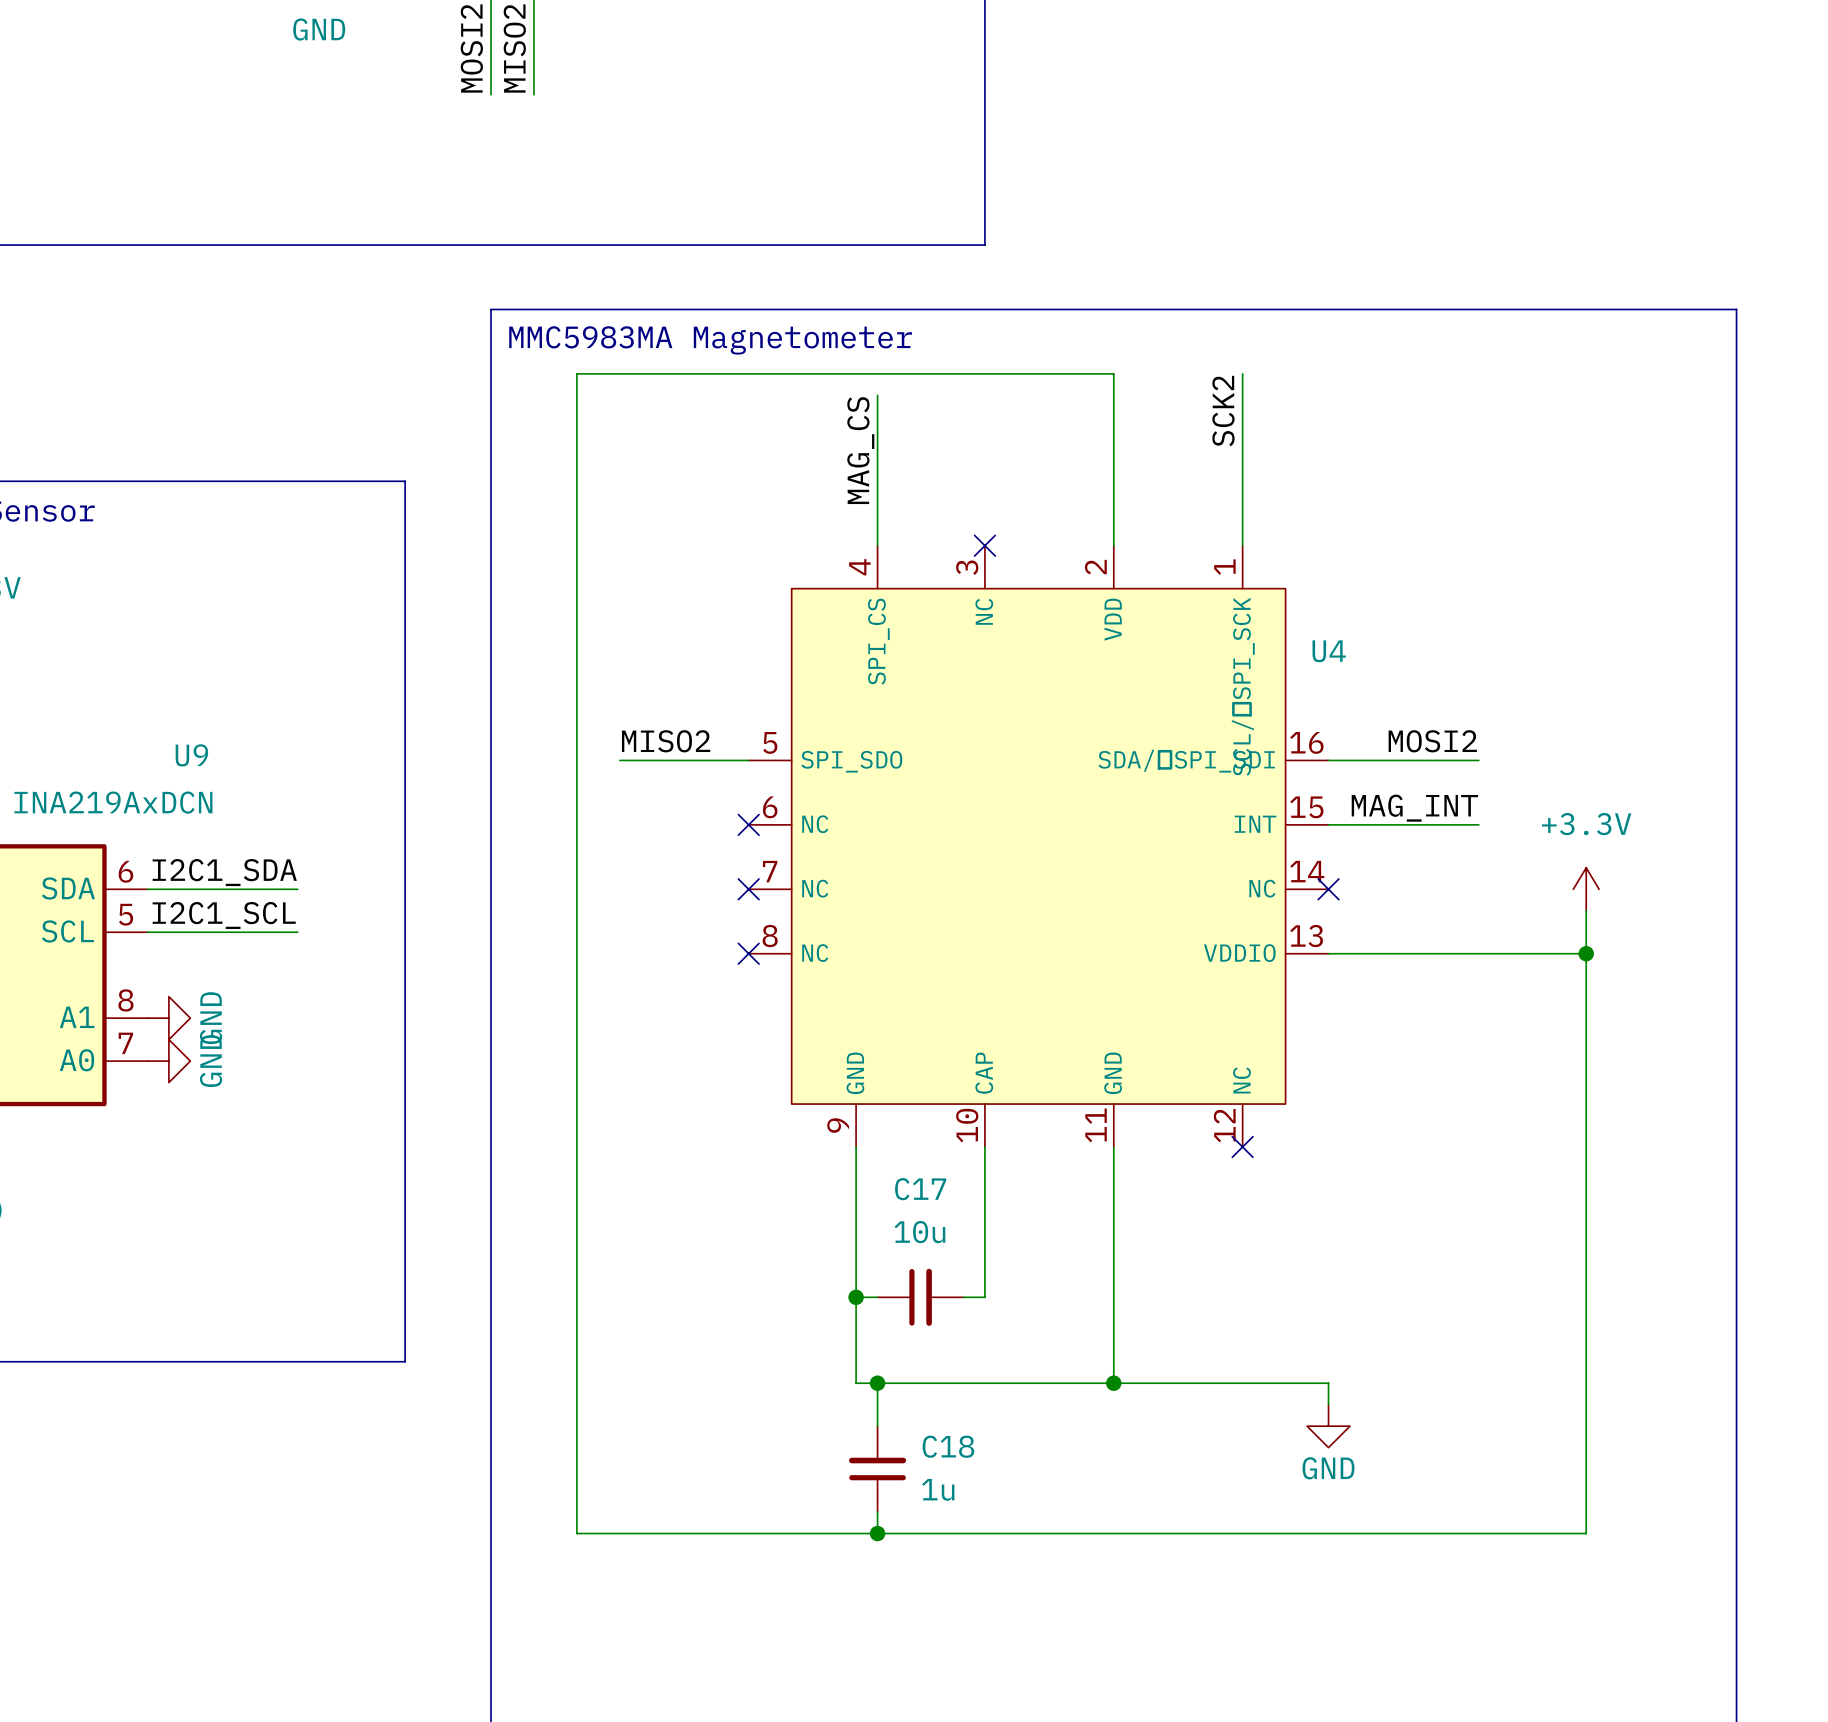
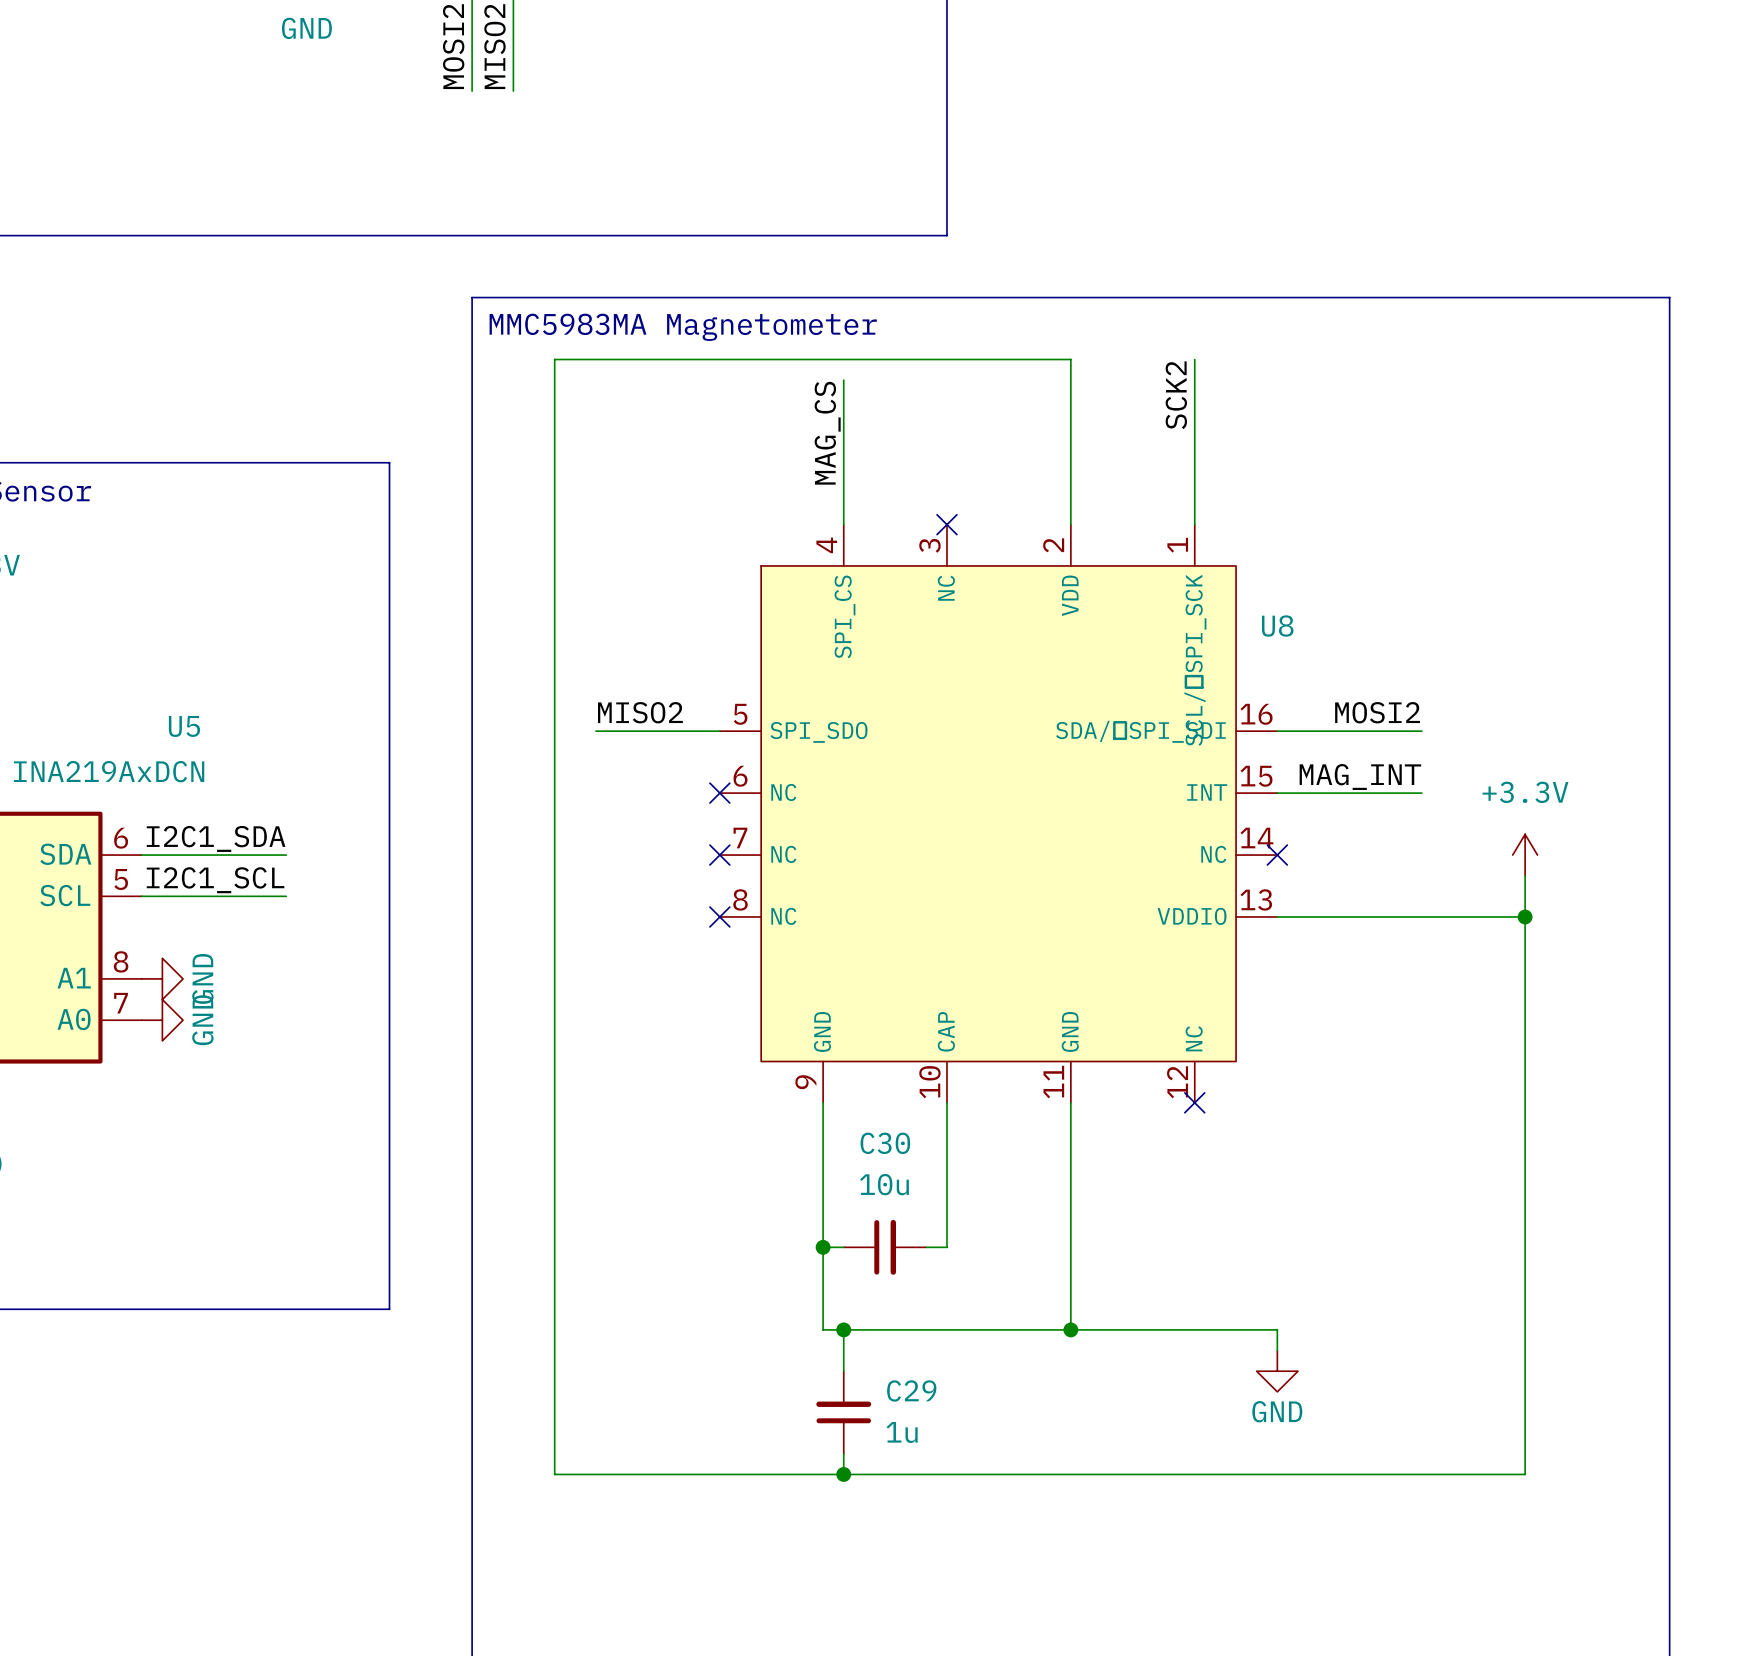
U4 name: U4 (1329, 651) -> U8 (1277, 626)
U9 name: U9 (191, 755) -> U5 (184, 726)
C17 name: C17 (920, 1189) -> C30 (885, 1143)
C18 name: C18 (948, 1446) -> C29 (911, 1390)

